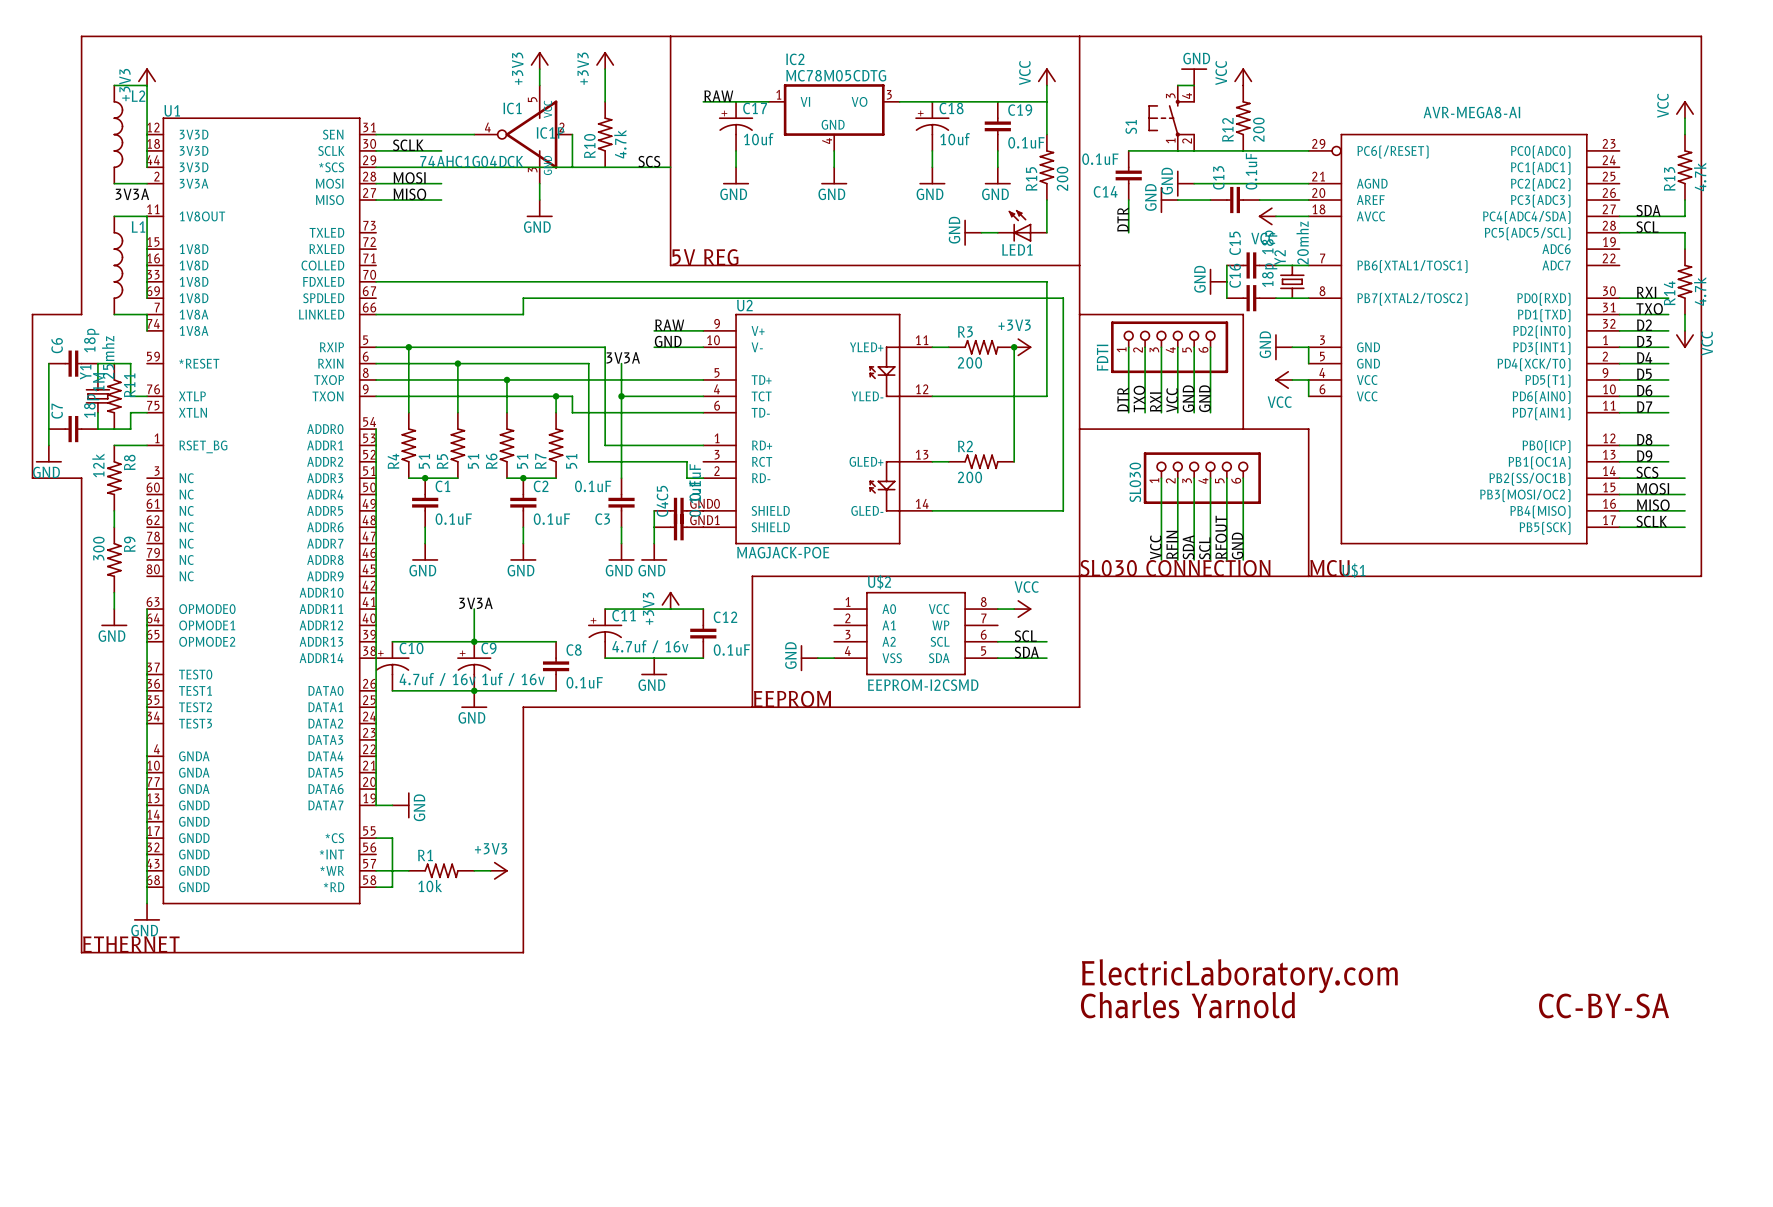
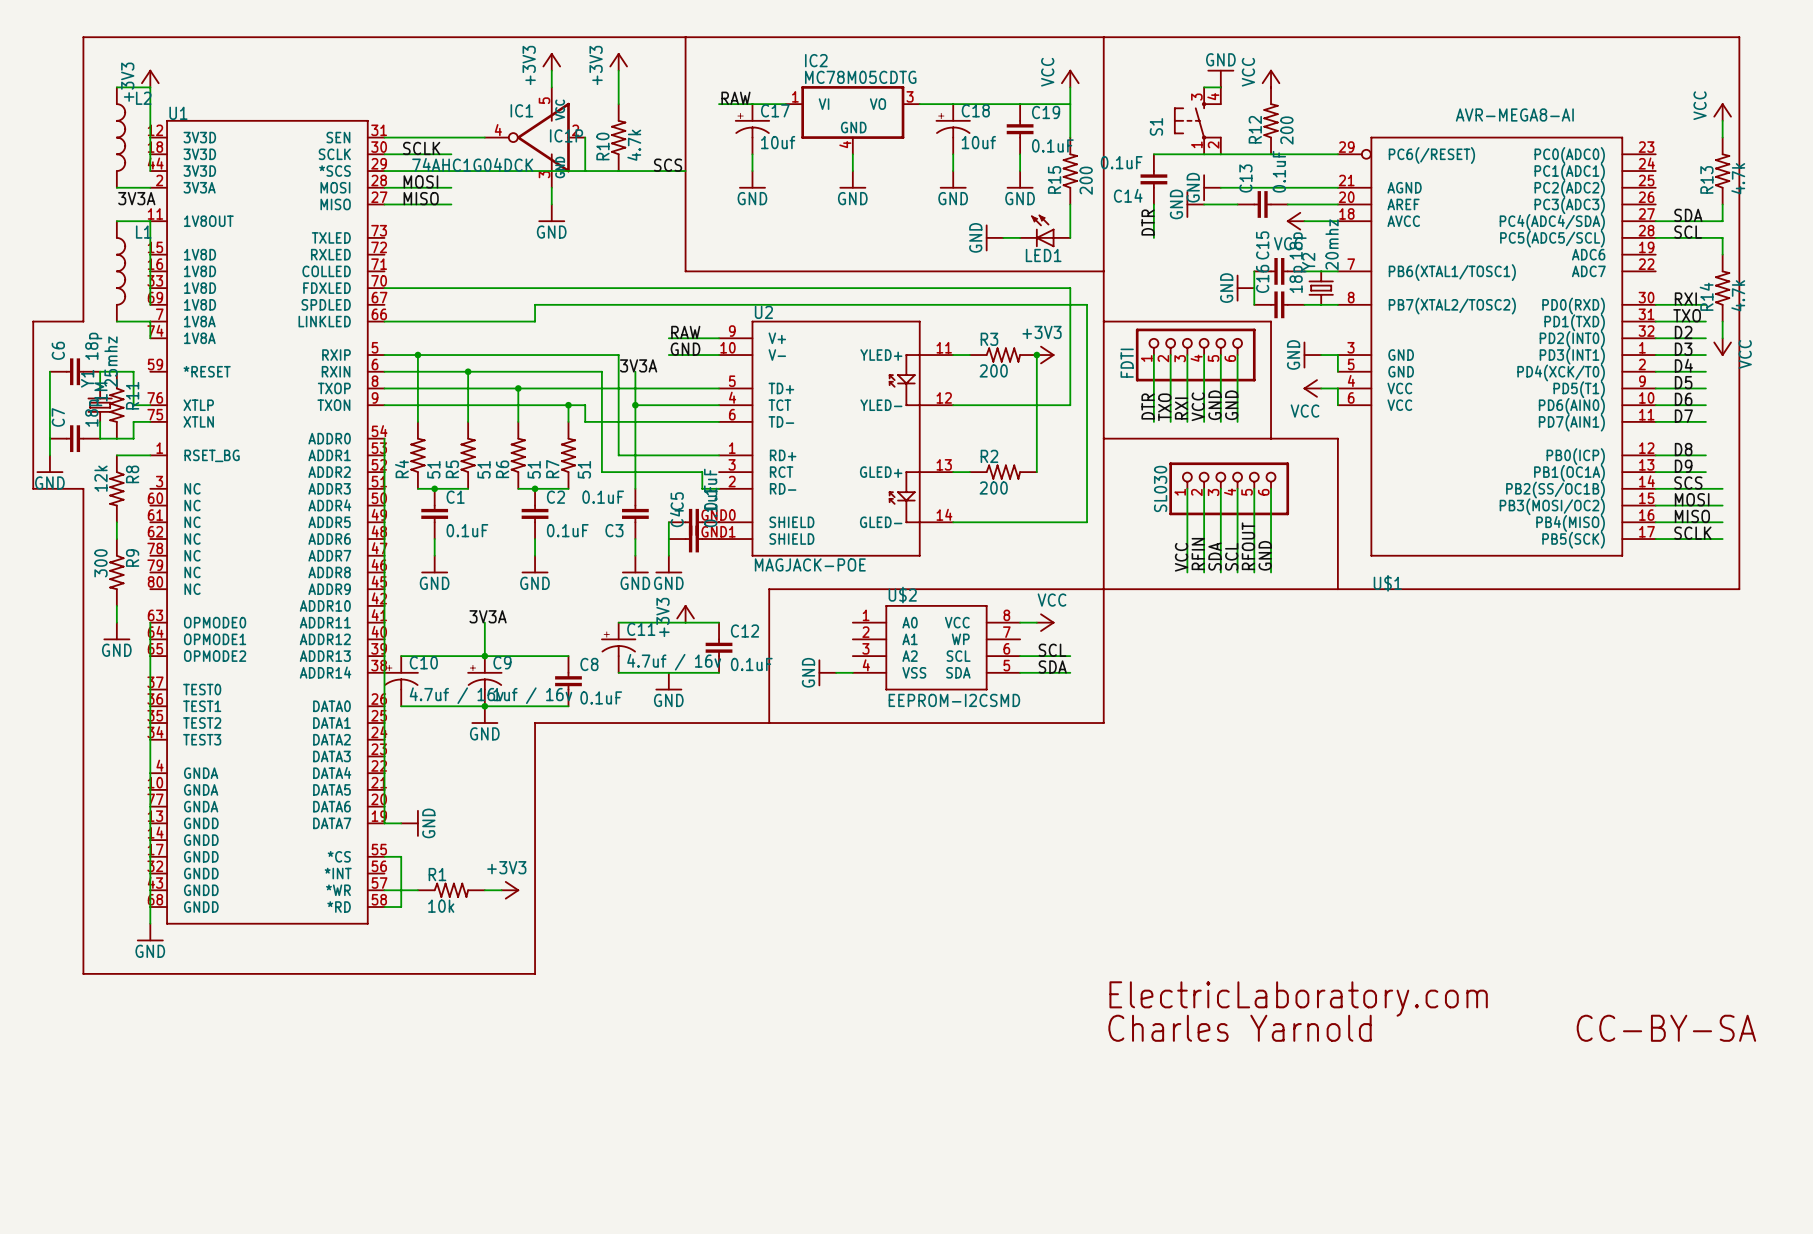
text: 5V REG (705, 257) -> none
text: SL030 CONNECTION (1175, 568) -> none
text: MCU (1329, 568) -> none
text: EEPROM (792, 699) -> none
text: ETHERNET (131, 944) -> none

